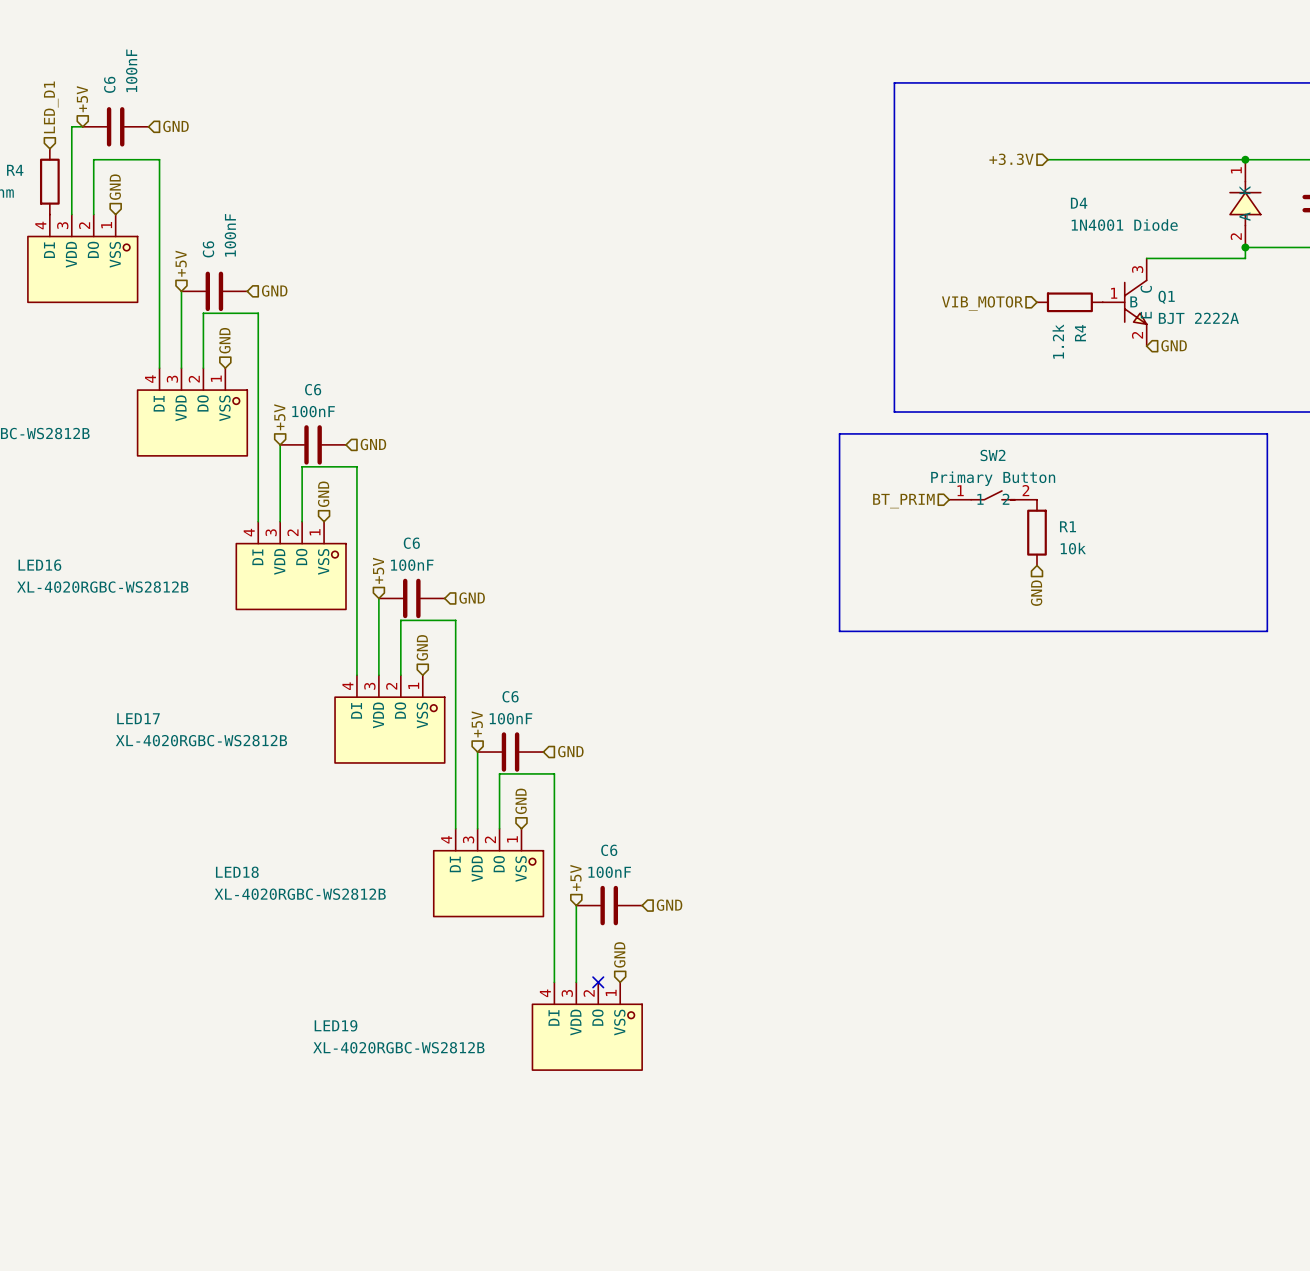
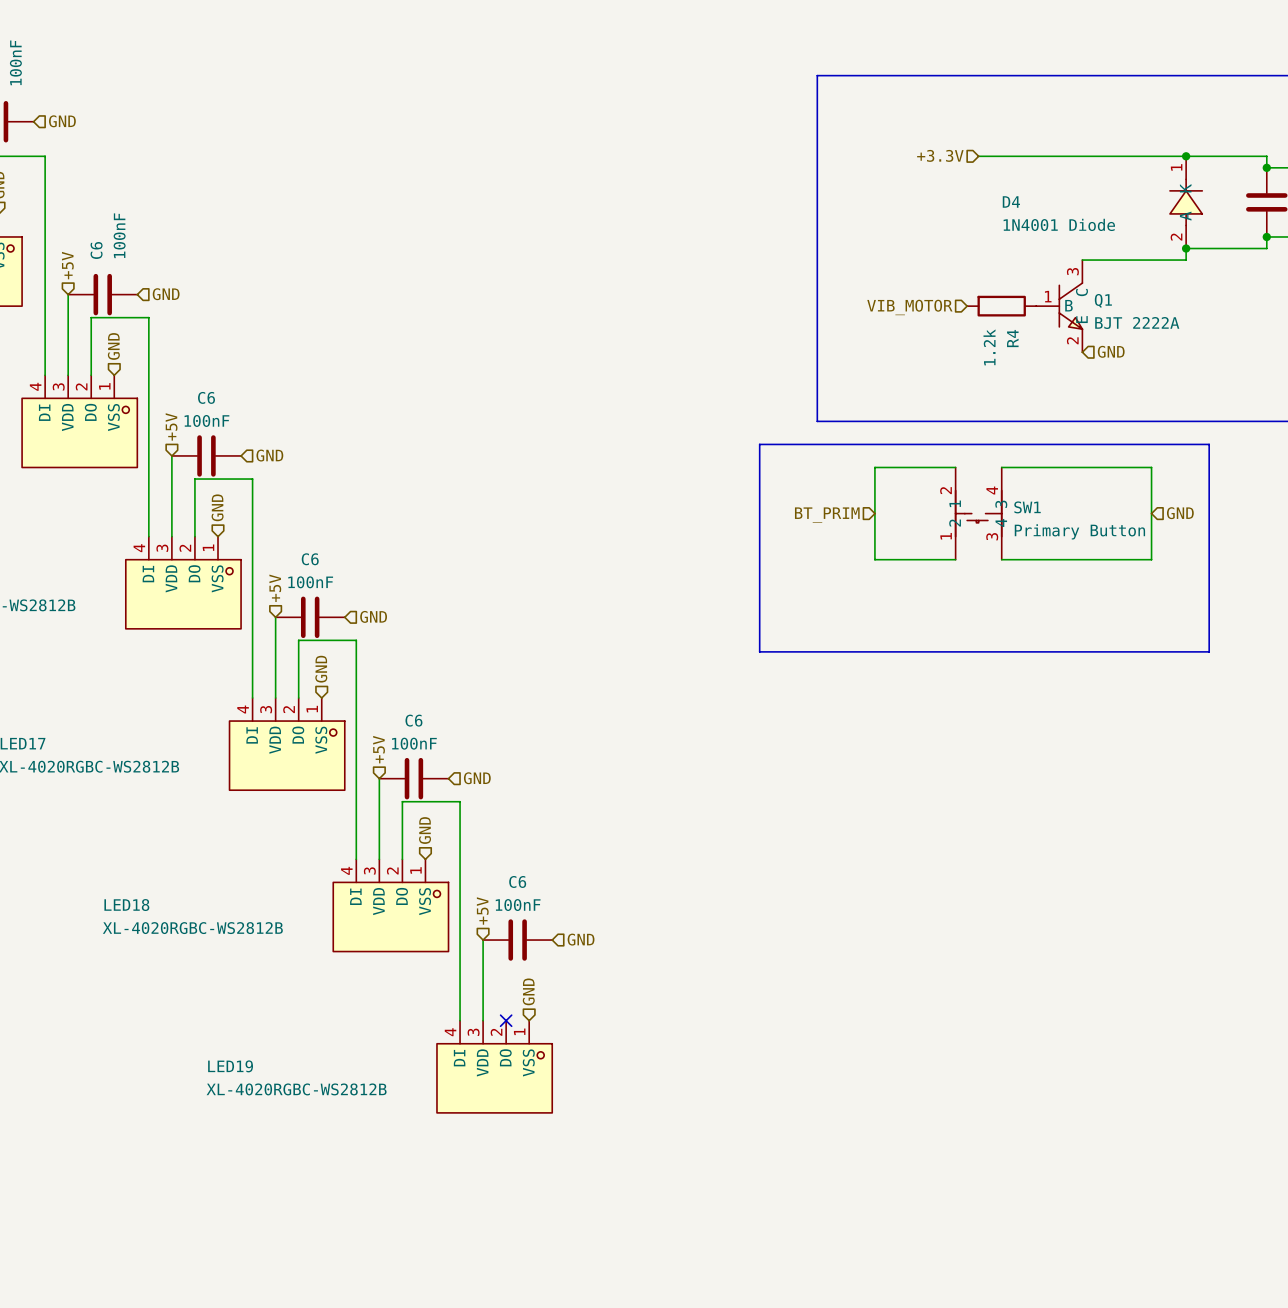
wire: none -> (955, 467) (874, 467) (874, 559) (955, 559)
wire: none -> (1001, 467) (1151, 467) (1151, 559) (1001, 559)
SW2: Primary Button (993, 495) -> none
SW1: none -> Primary Button (978, 513)
R1: 10k (1036, 532) -> none
hierarchical label rotation: 0° (1036, 593) -> 90° counterclockwise (1180, 513)
hierarchical label position: GND (1036, 593) -> GND (1180, 513)

